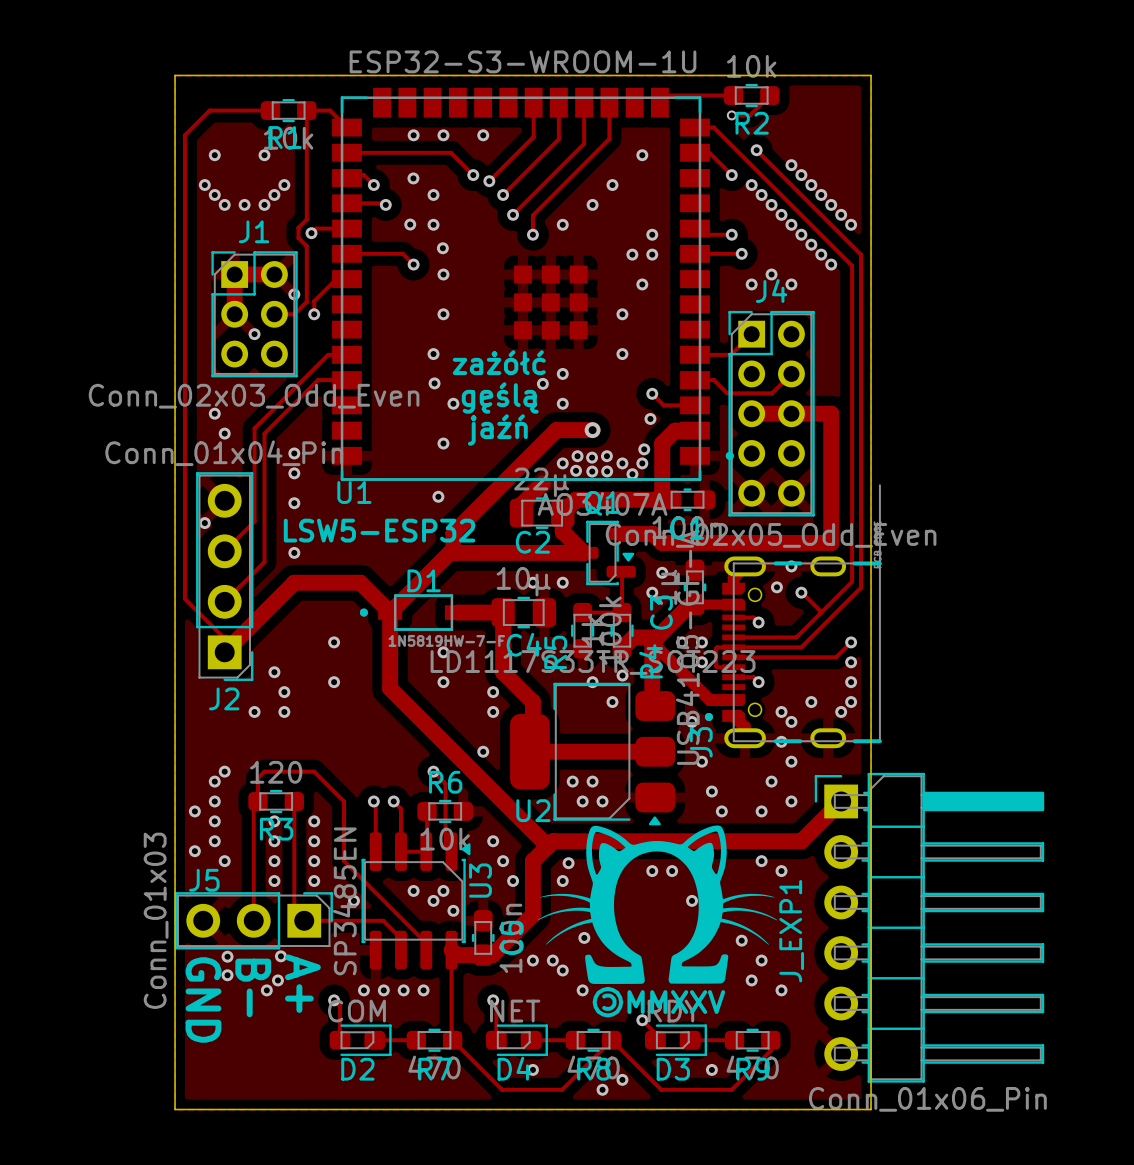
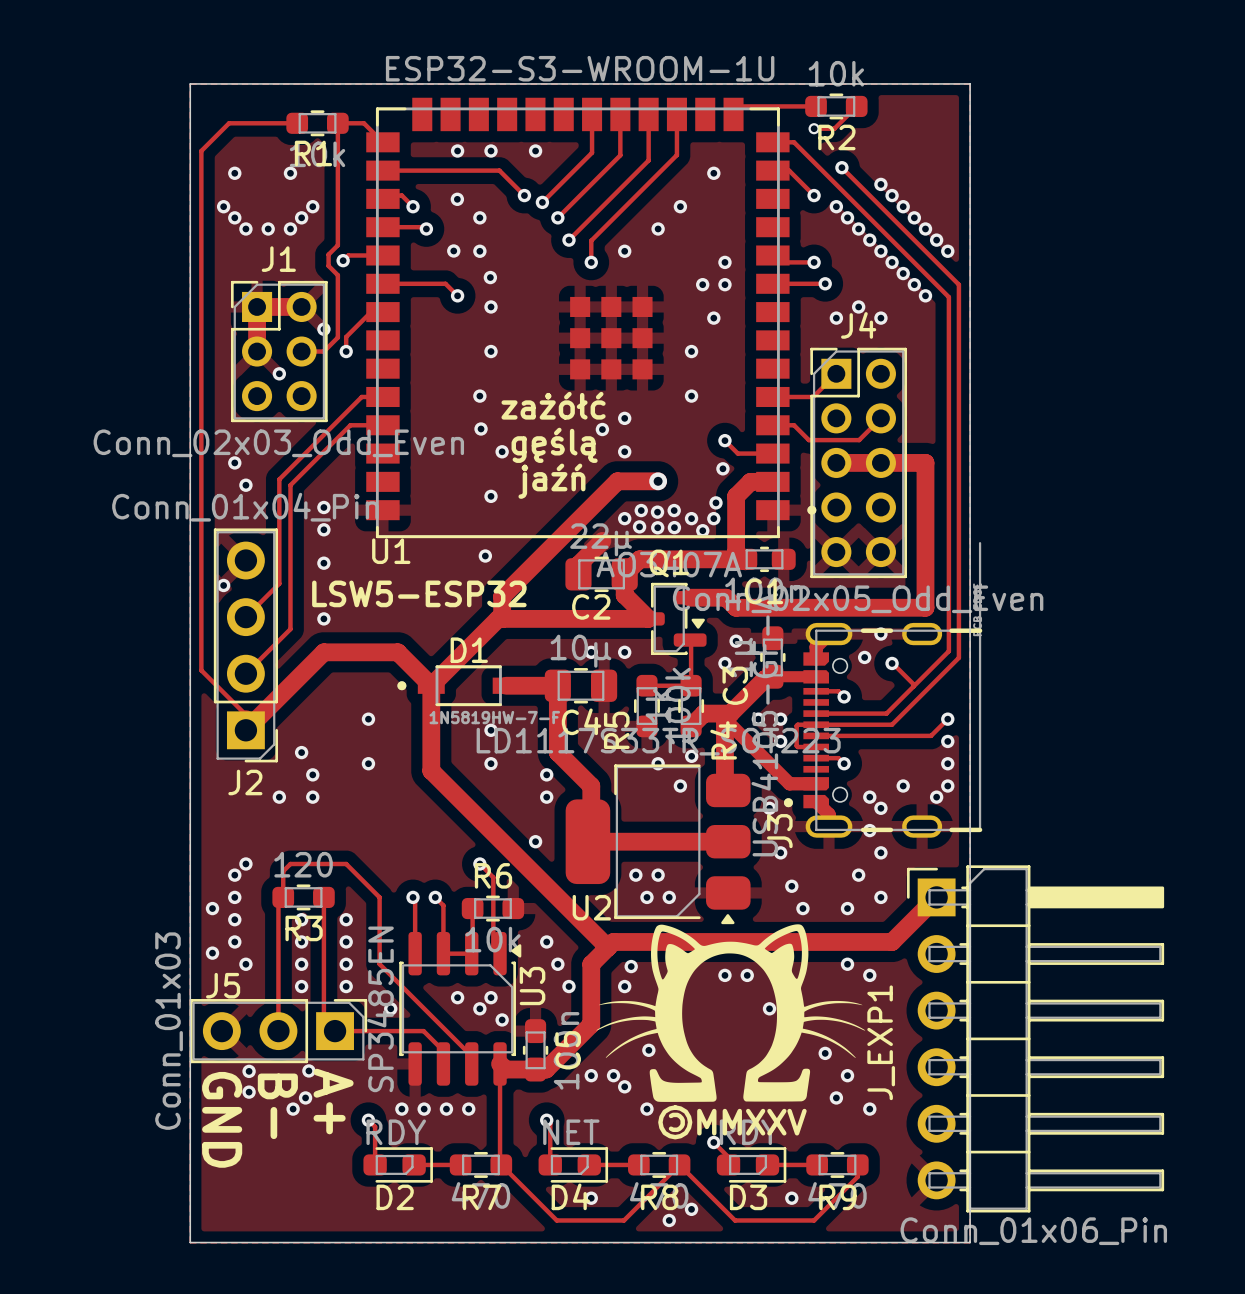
D2 value: COM (356, 1011) -> RDY (396, 1132)

